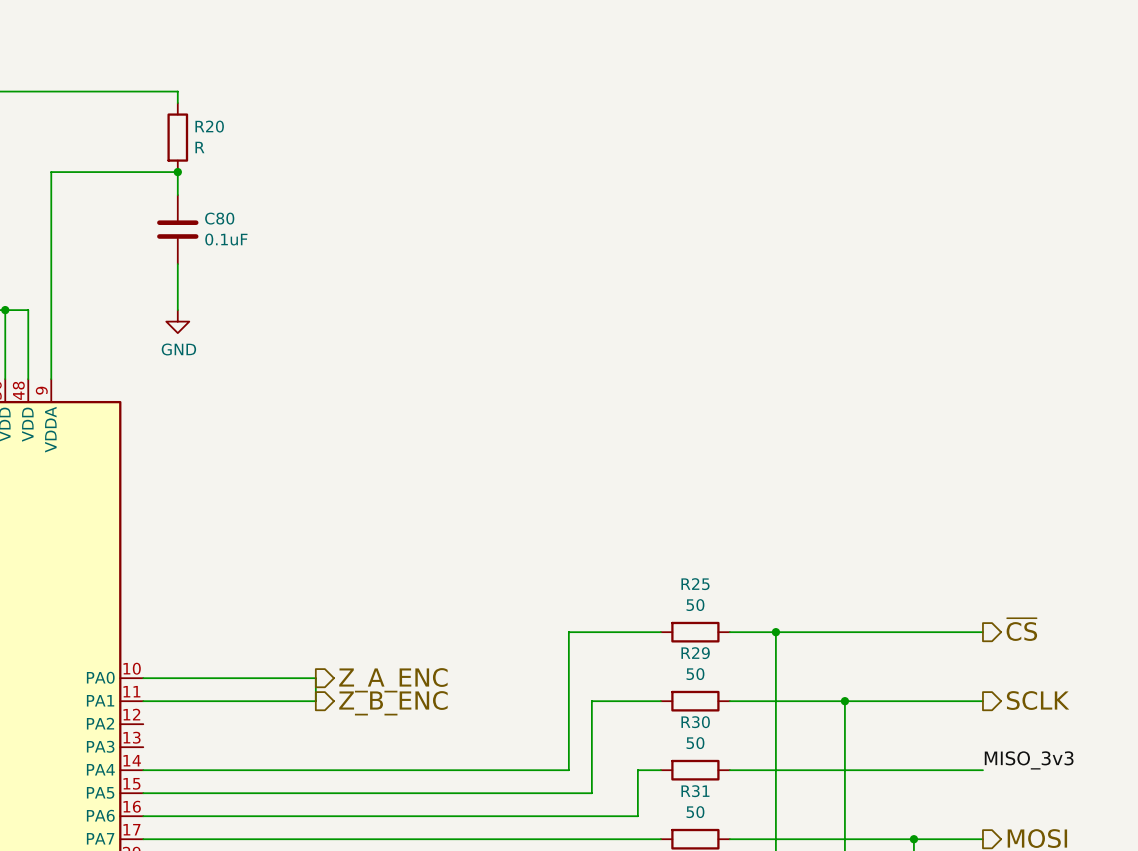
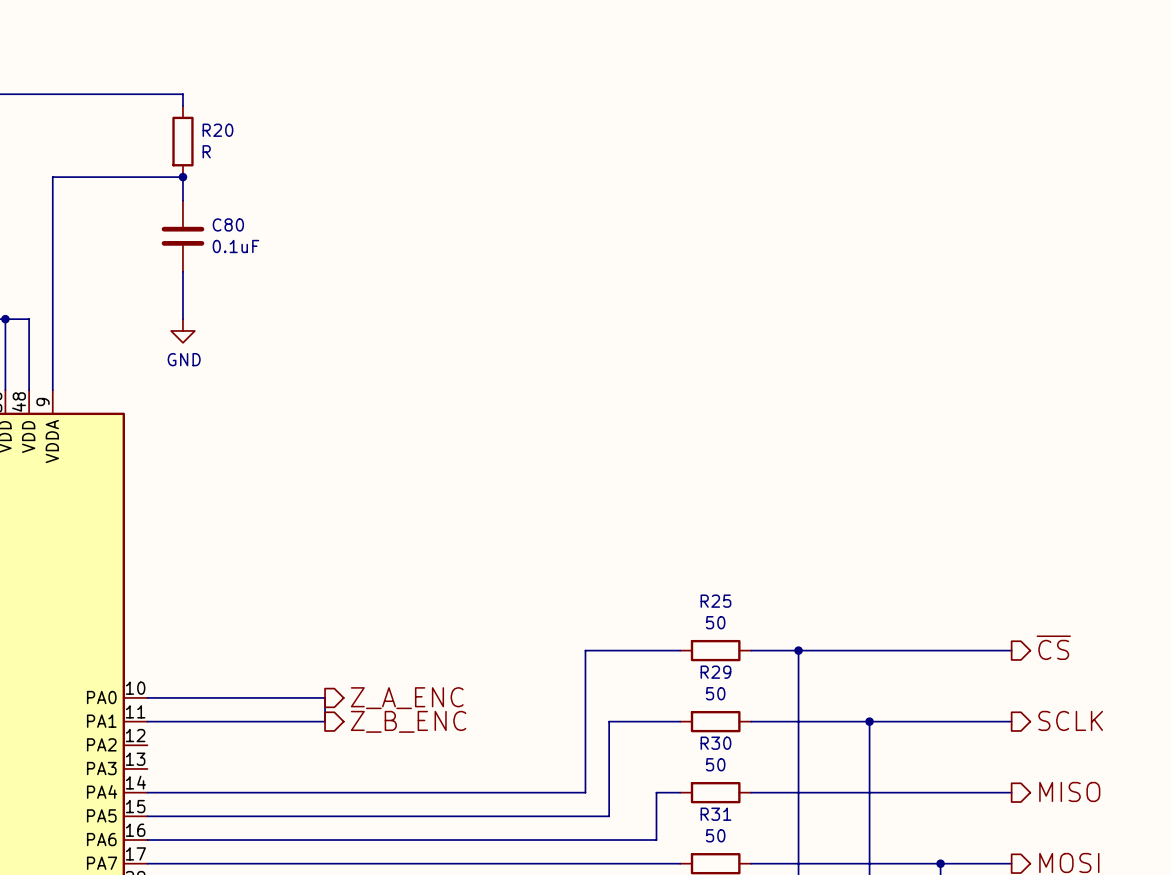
label: MISO_3v3 (1029, 760) -> none
hierarchical label: none -> MISO (1069, 791)

